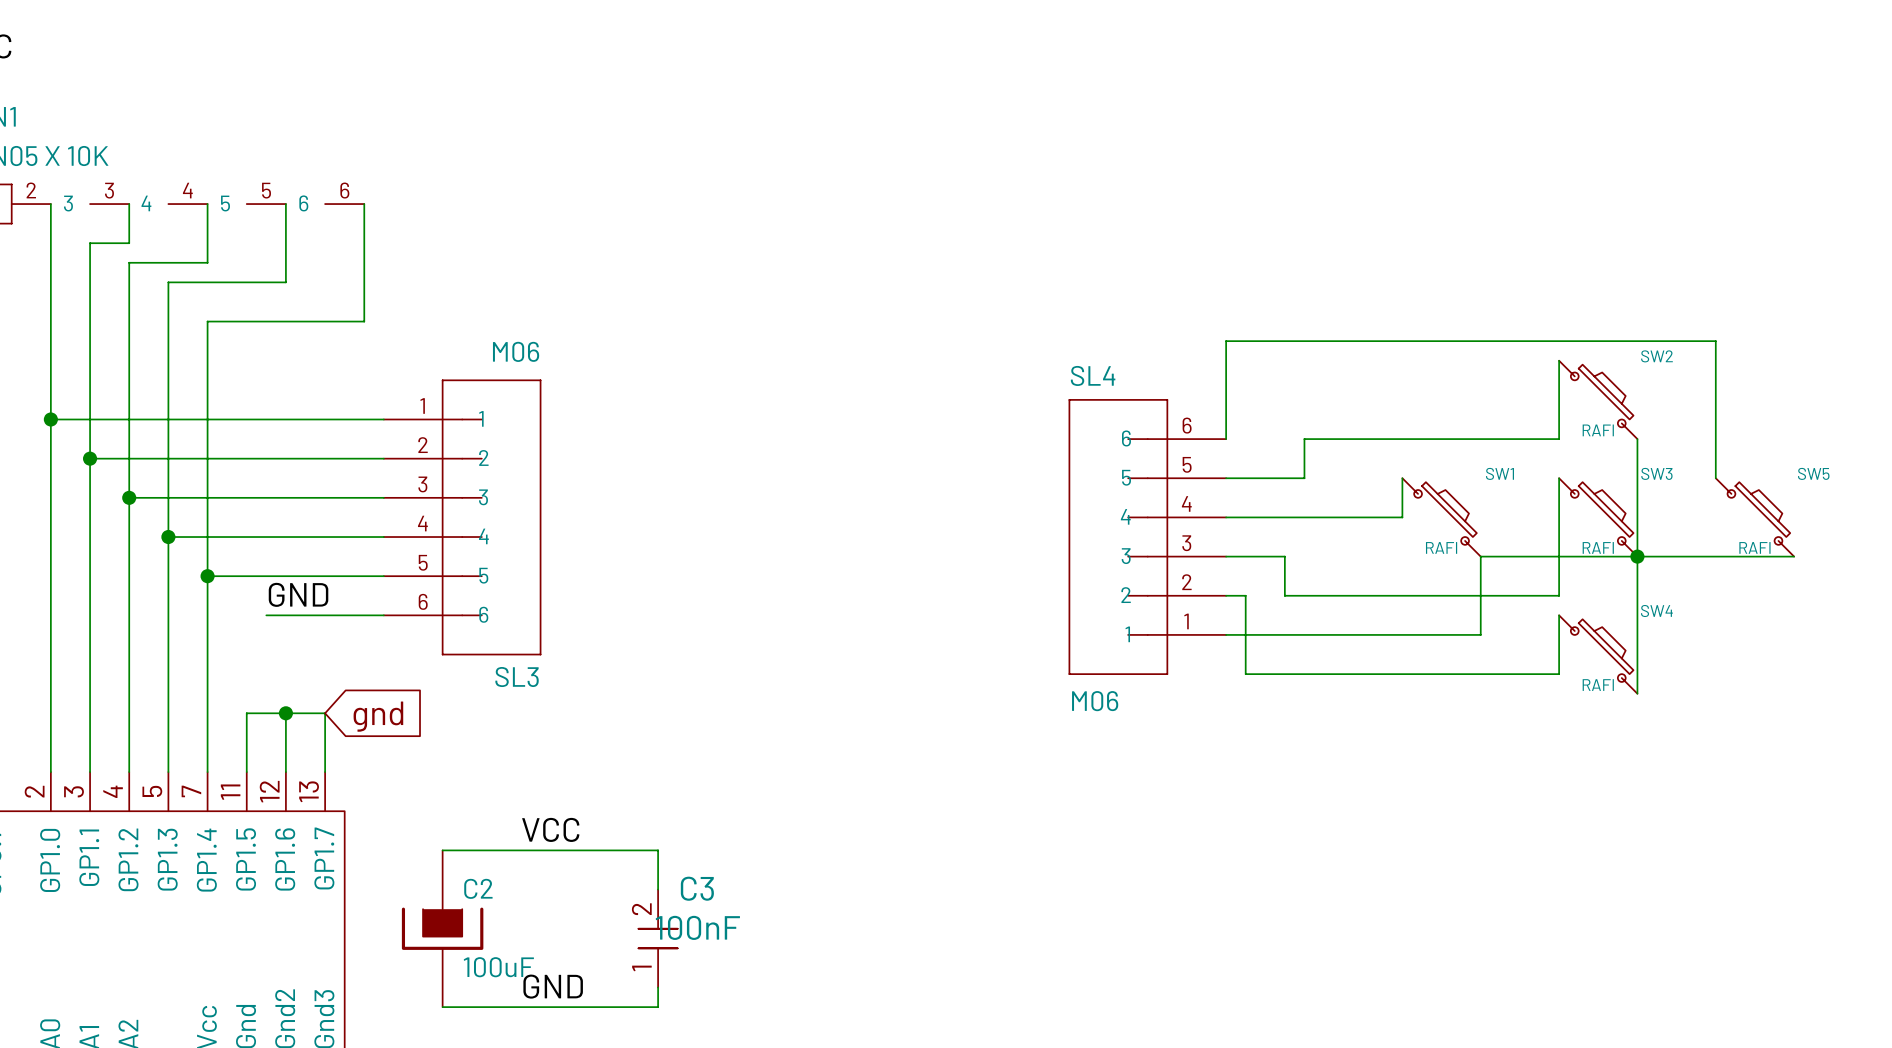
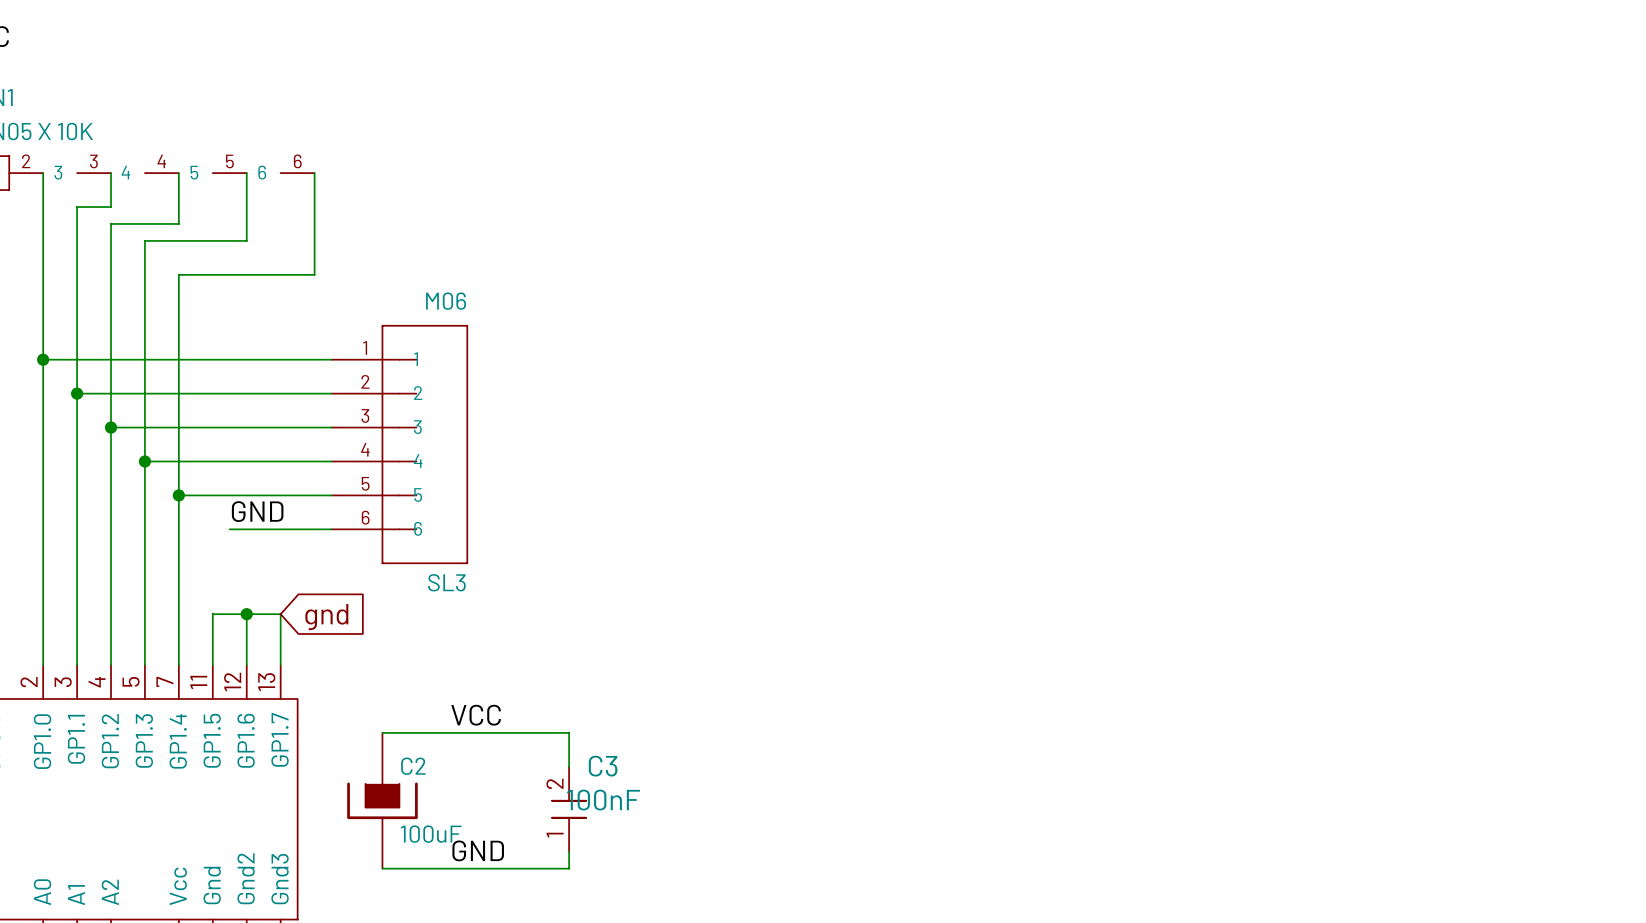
wire: (1559, 360) (1559, 439) (1304, 439) (1304, 478) (1226, 478) -> none
SW2: RAFI (1598, 399) -> none
wire: (1226, 439) (1226, 341) (1715, 341) (1715, 478) -> none
wire: (1637, 439) (1637, 693) -> none
wire: (1402, 478) (1402, 517) (1226, 517) -> none
wire: (1559, 478) (1559, 595) (1284, 595) (1284, 556) (1226, 556) -> none
SW1: RAFI (1441, 517) -> none
SW3: RAFI (1598, 517) -> none
SW5: RAFI (1754, 517) -> none
SL4: M06 (1147, 537) -> none
junction: (1637, 556) -> none
wire: (1794, 556) (1480, 556) (1480, 634) (1226, 634) -> none
wire: (1226, 595) (1245, 595) (1245, 674) (1559, 674) (1559, 615) -> none
SW4: RAFI (1598, 654) -> none

